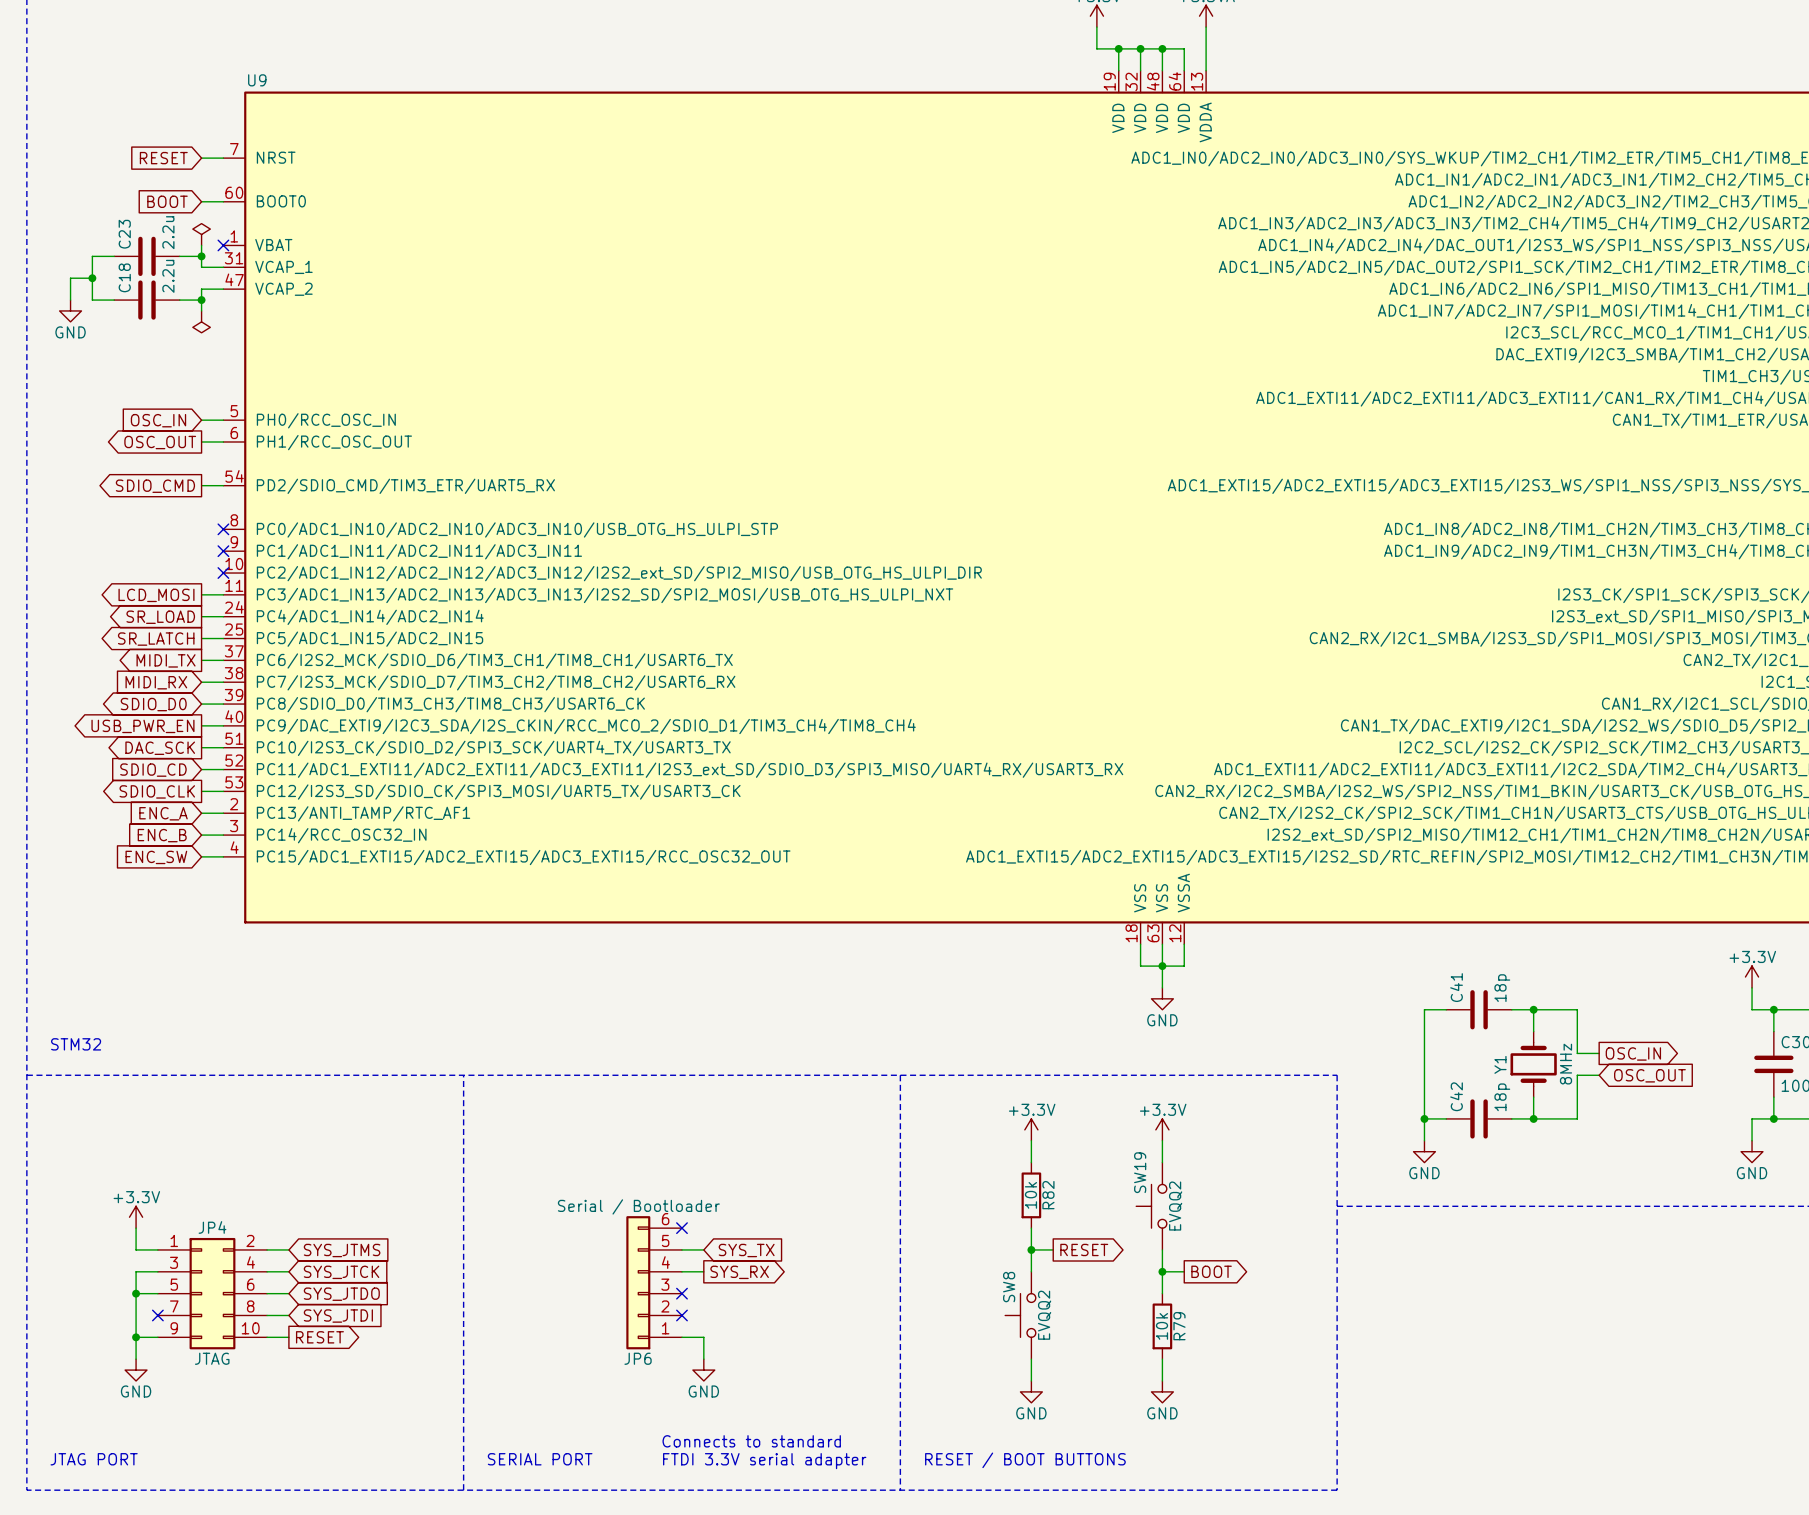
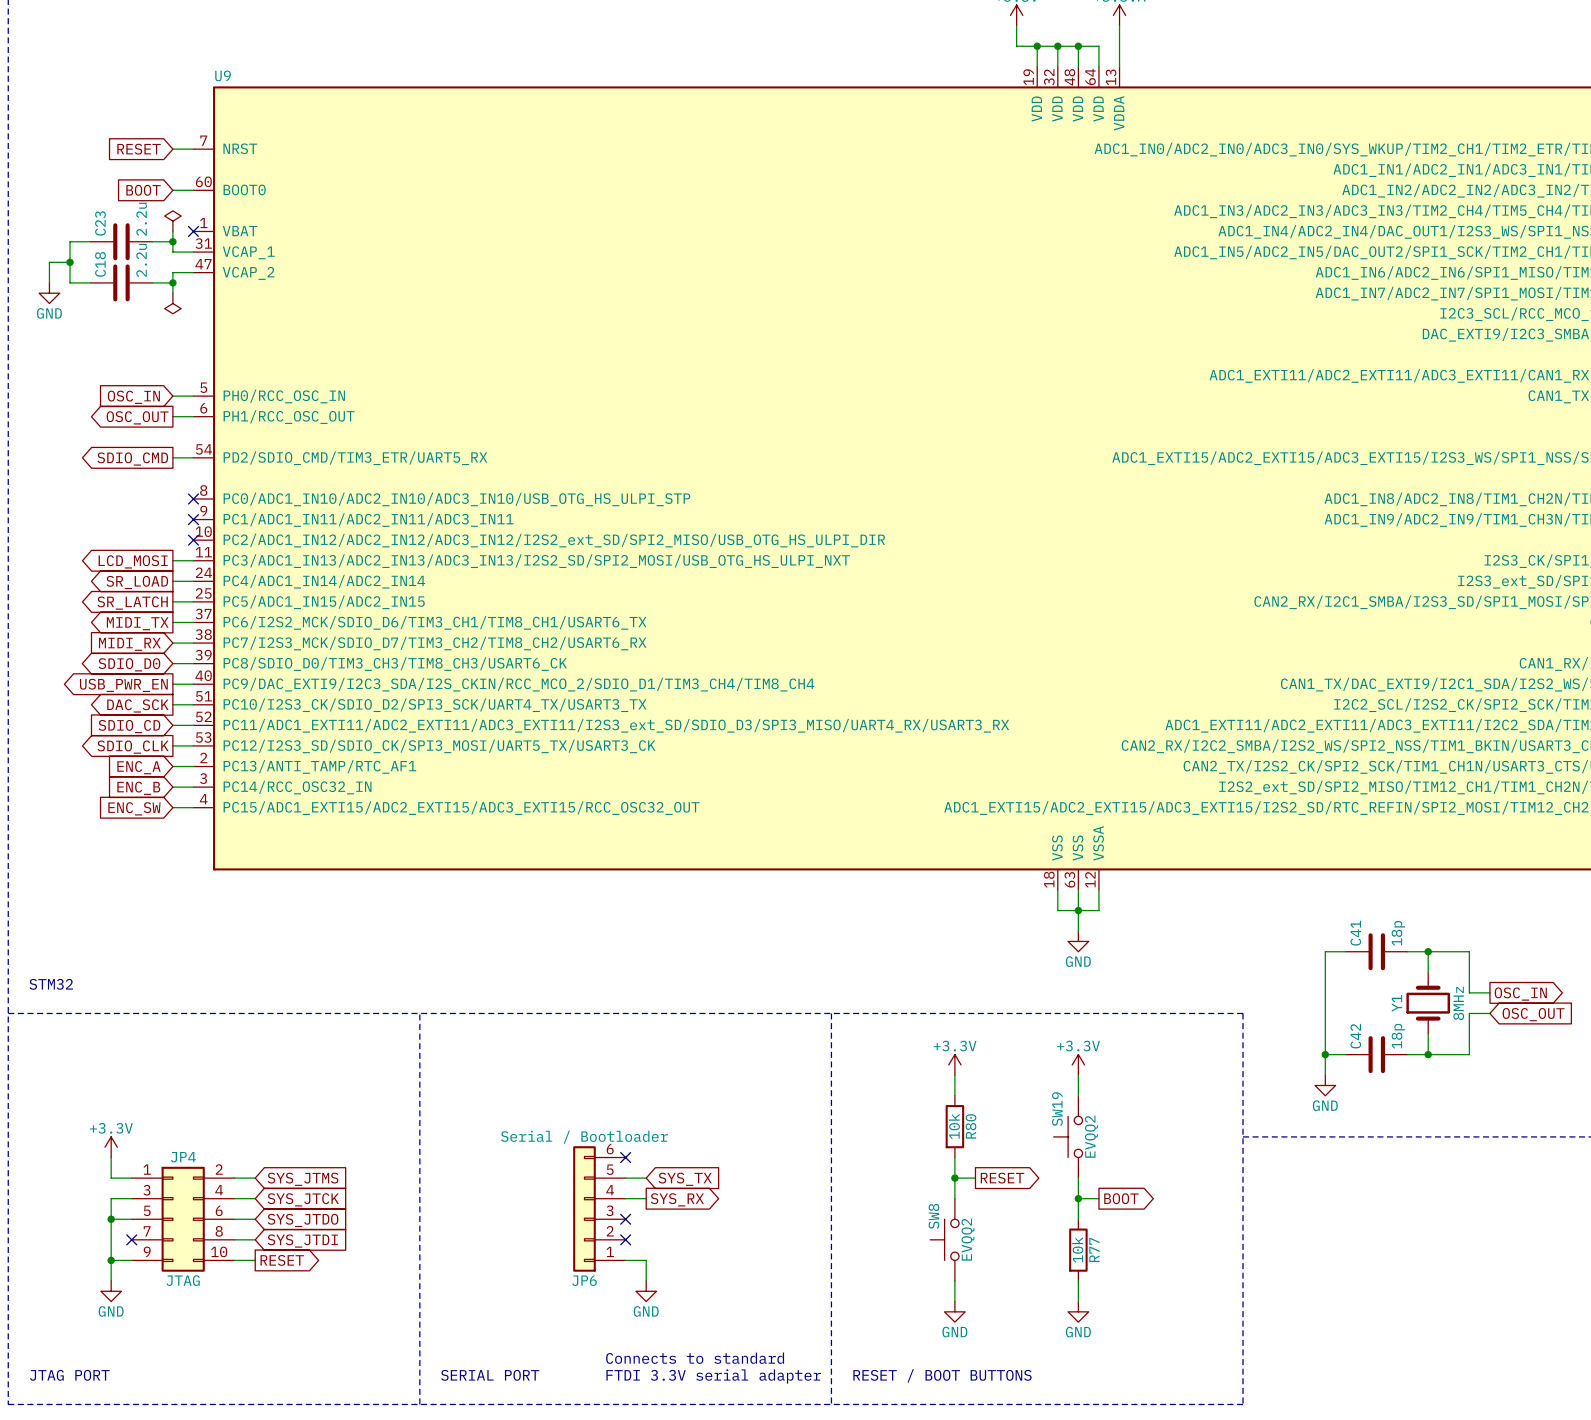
R82 name: R82 (1048, 1195) -> R80 (970, 1126)
R79 name: R79 (1179, 1326) -> R77 (1094, 1249)

